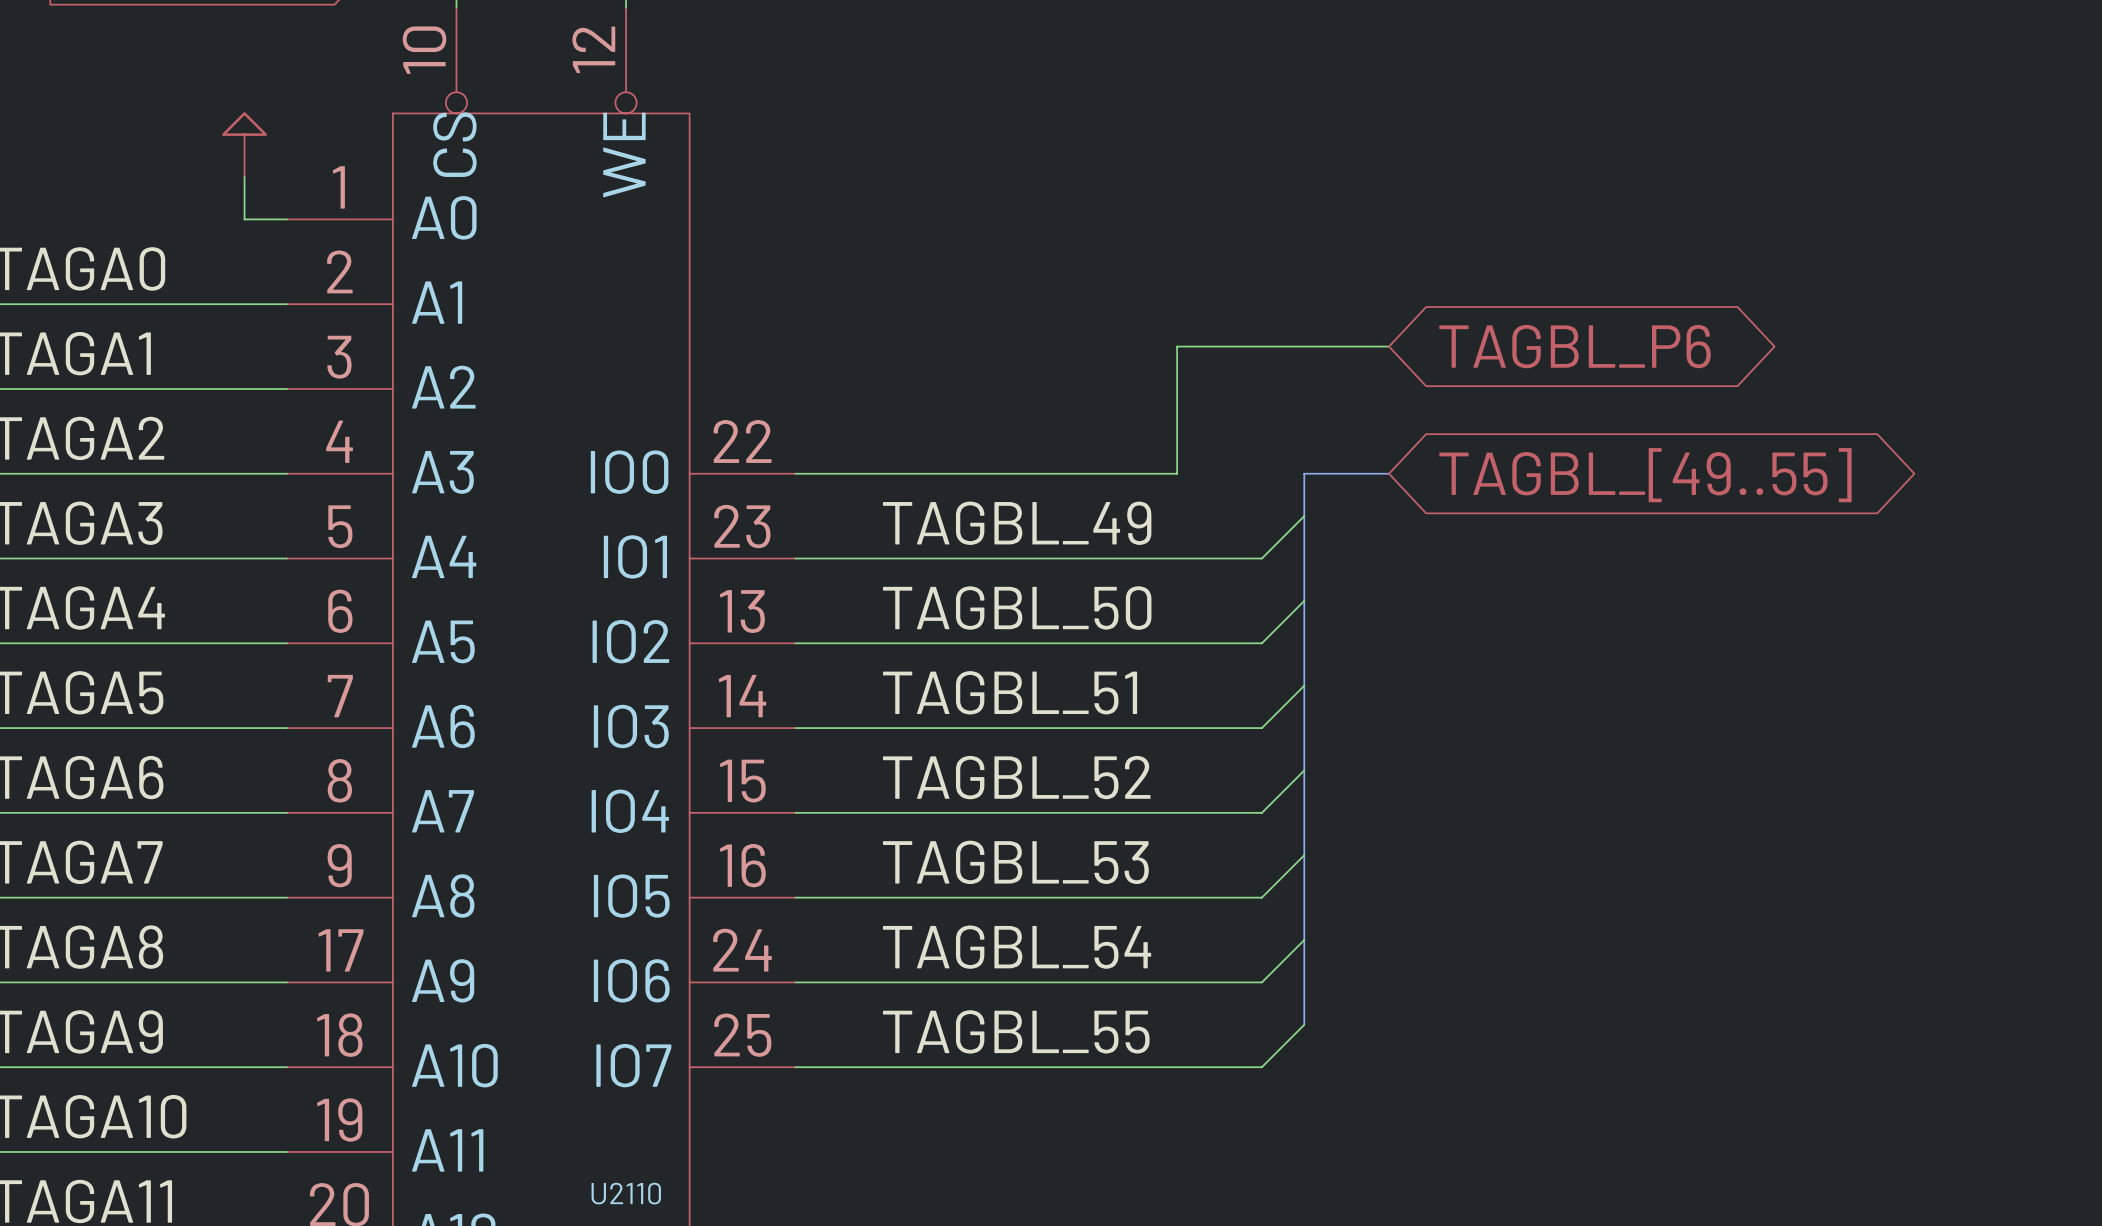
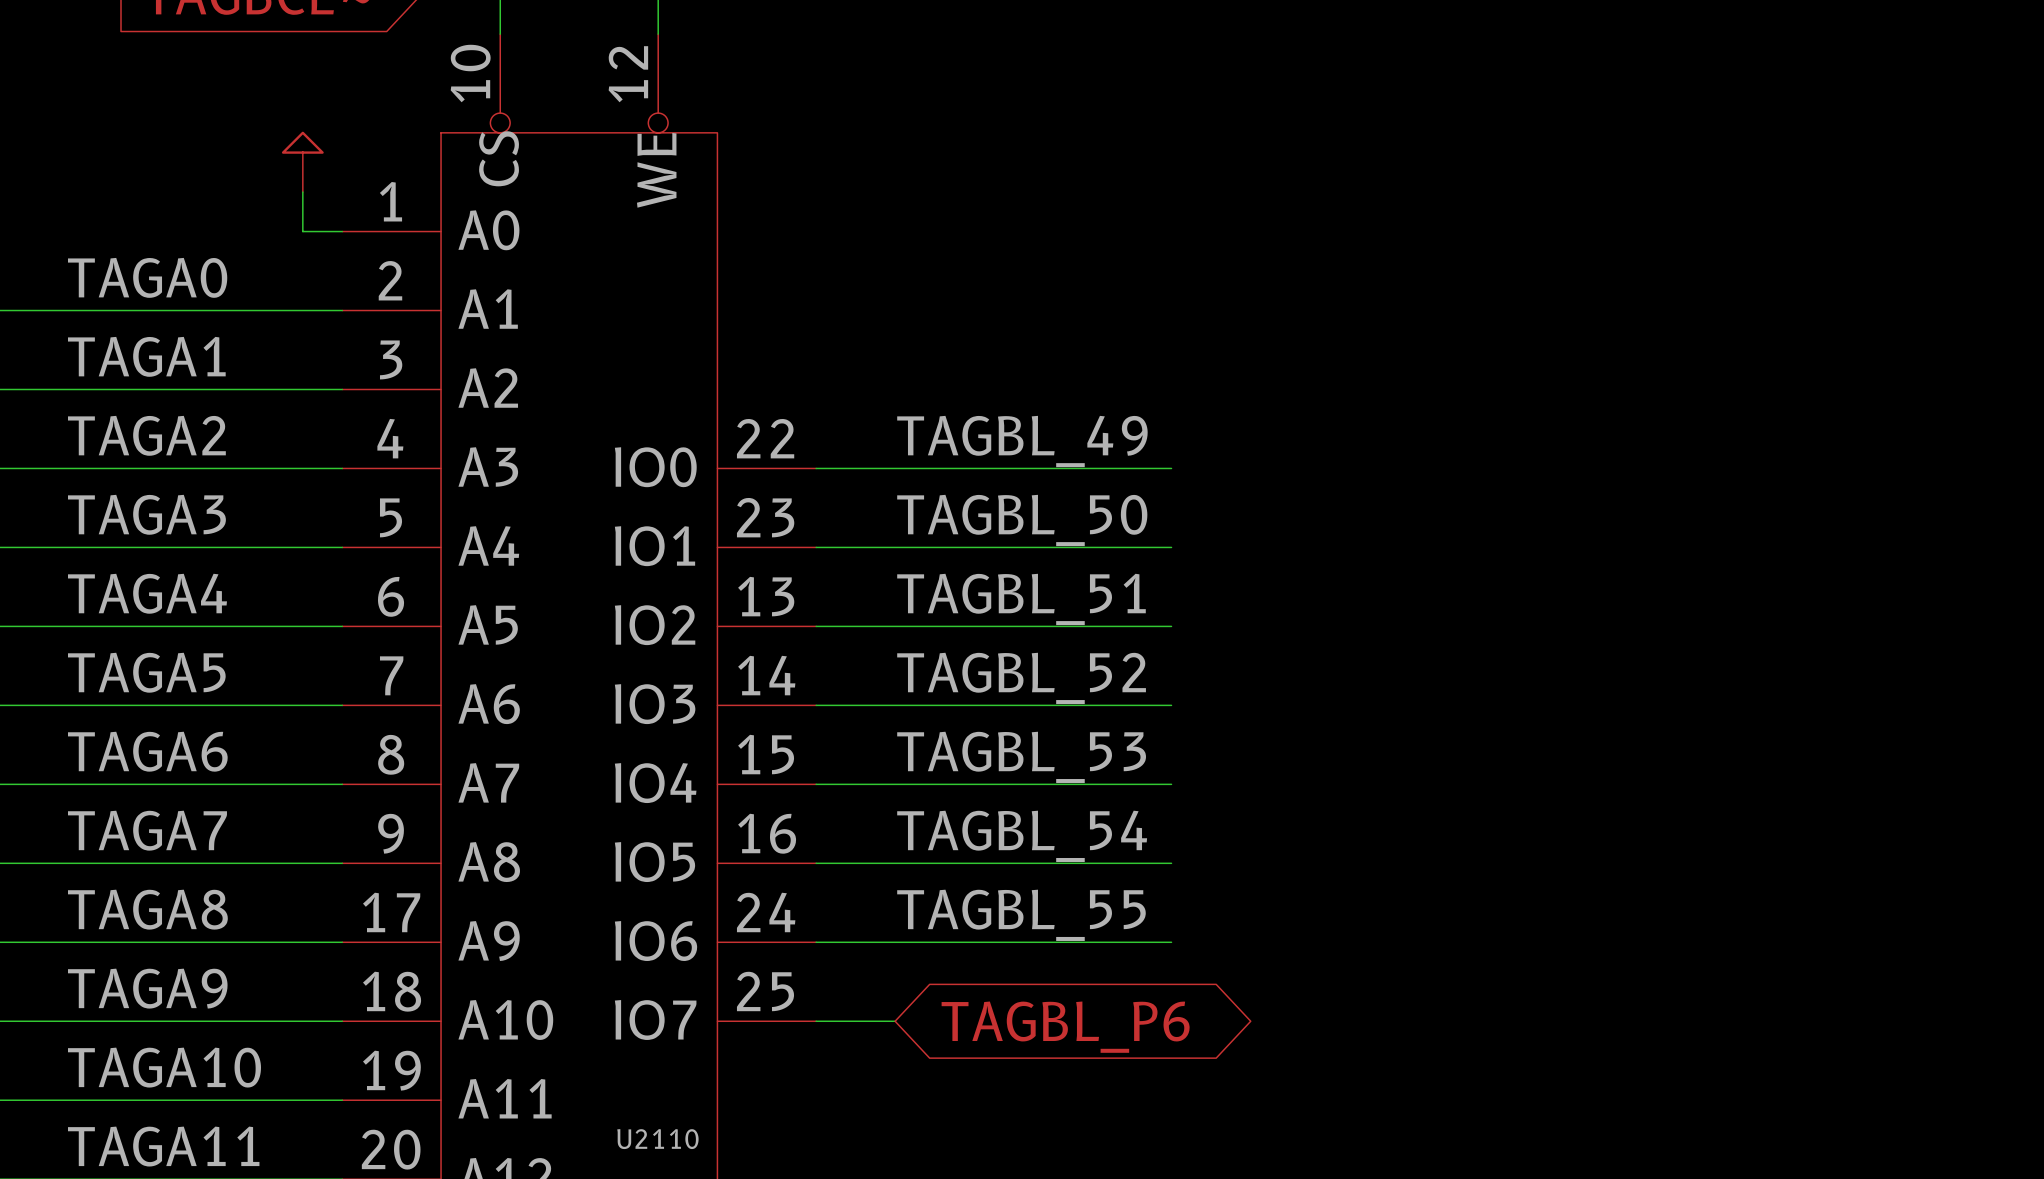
wire: (1389, 346) (1177, 346) (1177, 473) -> none
global label: TAGBL_P6 (1575, 346) -> none
label: none -> TAGBL_49 (1022, 441)
bus: (1389, 473) (1304, 473) (1304, 1024) -> none
global label: TAGBL_[49..55] (1645, 475) -> none
wire: (1304, 516) (1261, 558) (1177, 558) -> none
label: TAGBL_49 (1017, 523) -> TAGBL_50 (1022, 520)
wire: (1304, 600) (1261, 643) (1177, 643) -> none
label: TAGBL_50 (1017, 608) -> TAGBL_51 (1021, 599)
wire: (1304, 685) (1261, 728) (1177, 728) -> none
label: TAGBL_51 (1010, 692) -> TAGBL_52 (1021, 678)
wire: (1304, 770) (1261, 812) (1177, 812) -> none
label: TAGBL_52 (1016, 777) -> TAGBL_53 (1021, 757)
wire: (1304, 855) (1261, 897) (1177, 897) -> none
label: TAGBL_53 (1015, 862) -> TAGBL_54 (1022, 836)
wire: (1304, 940) (1261, 982) (1177, 982) -> none
label: TAGBL_54 (1017, 947) -> TAGBL_55 (1021, 915)
wire: (1304, 1024) (1261, 1067) (880, 1067) -> none
label: TAGBL_55 (1016, 1031) -> none
global label: none -> TAGBL_P6 (1065, 1027)

